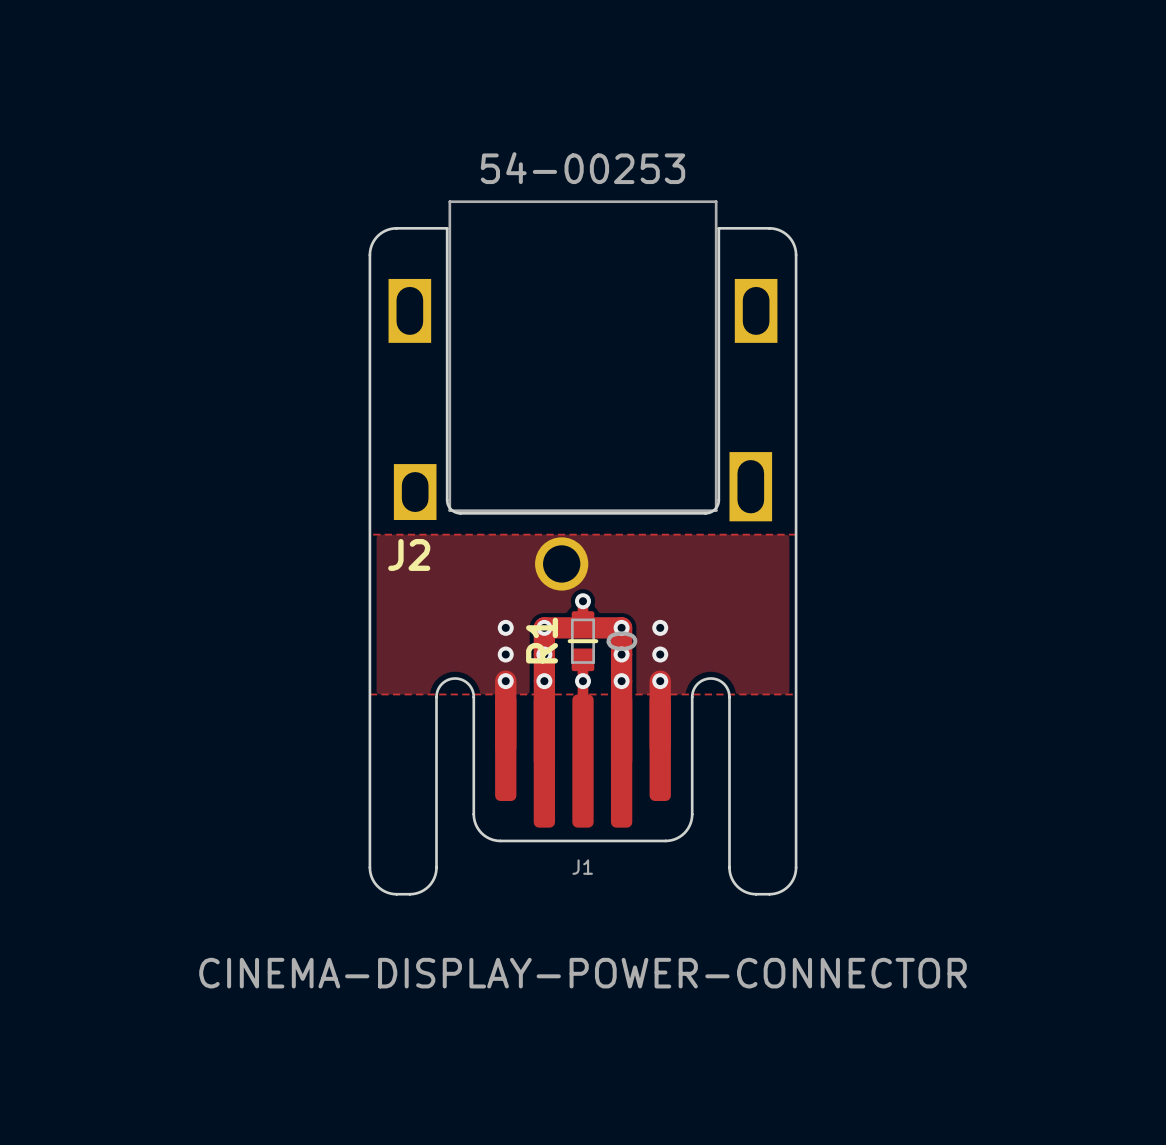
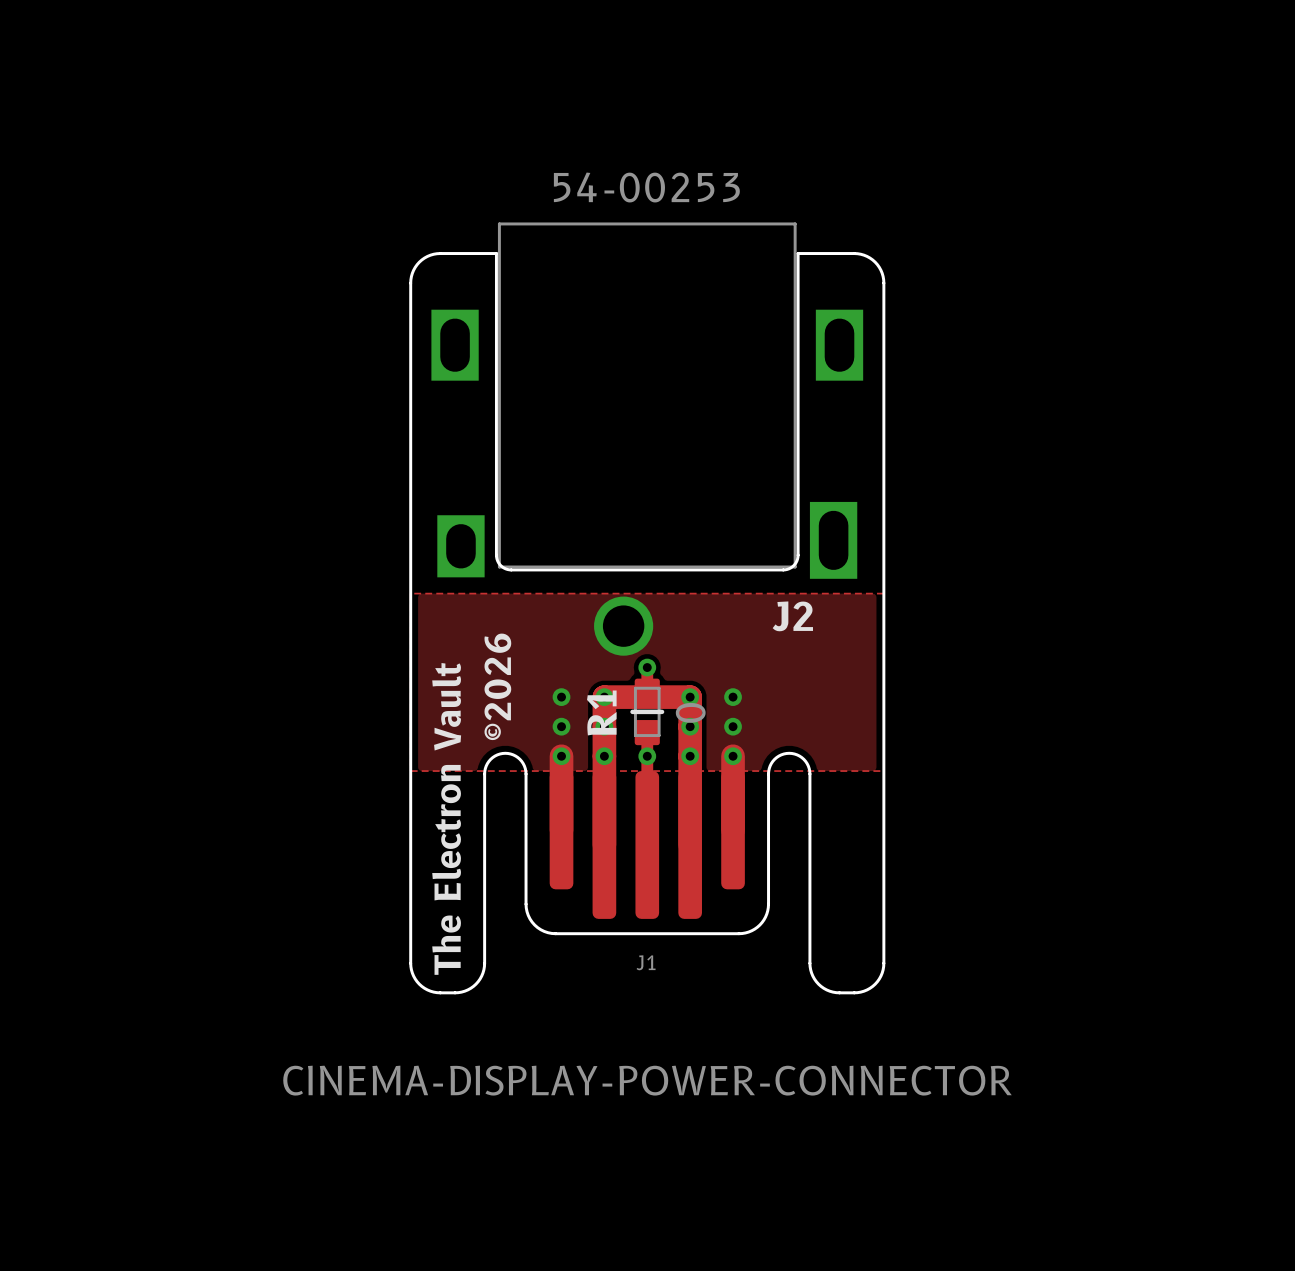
J2 name position: J2 (409, 554) -> J2 (792, 616)
text: none -> ©2026 (497, 686)
text: none -> The Electron Vault (446, 818)

